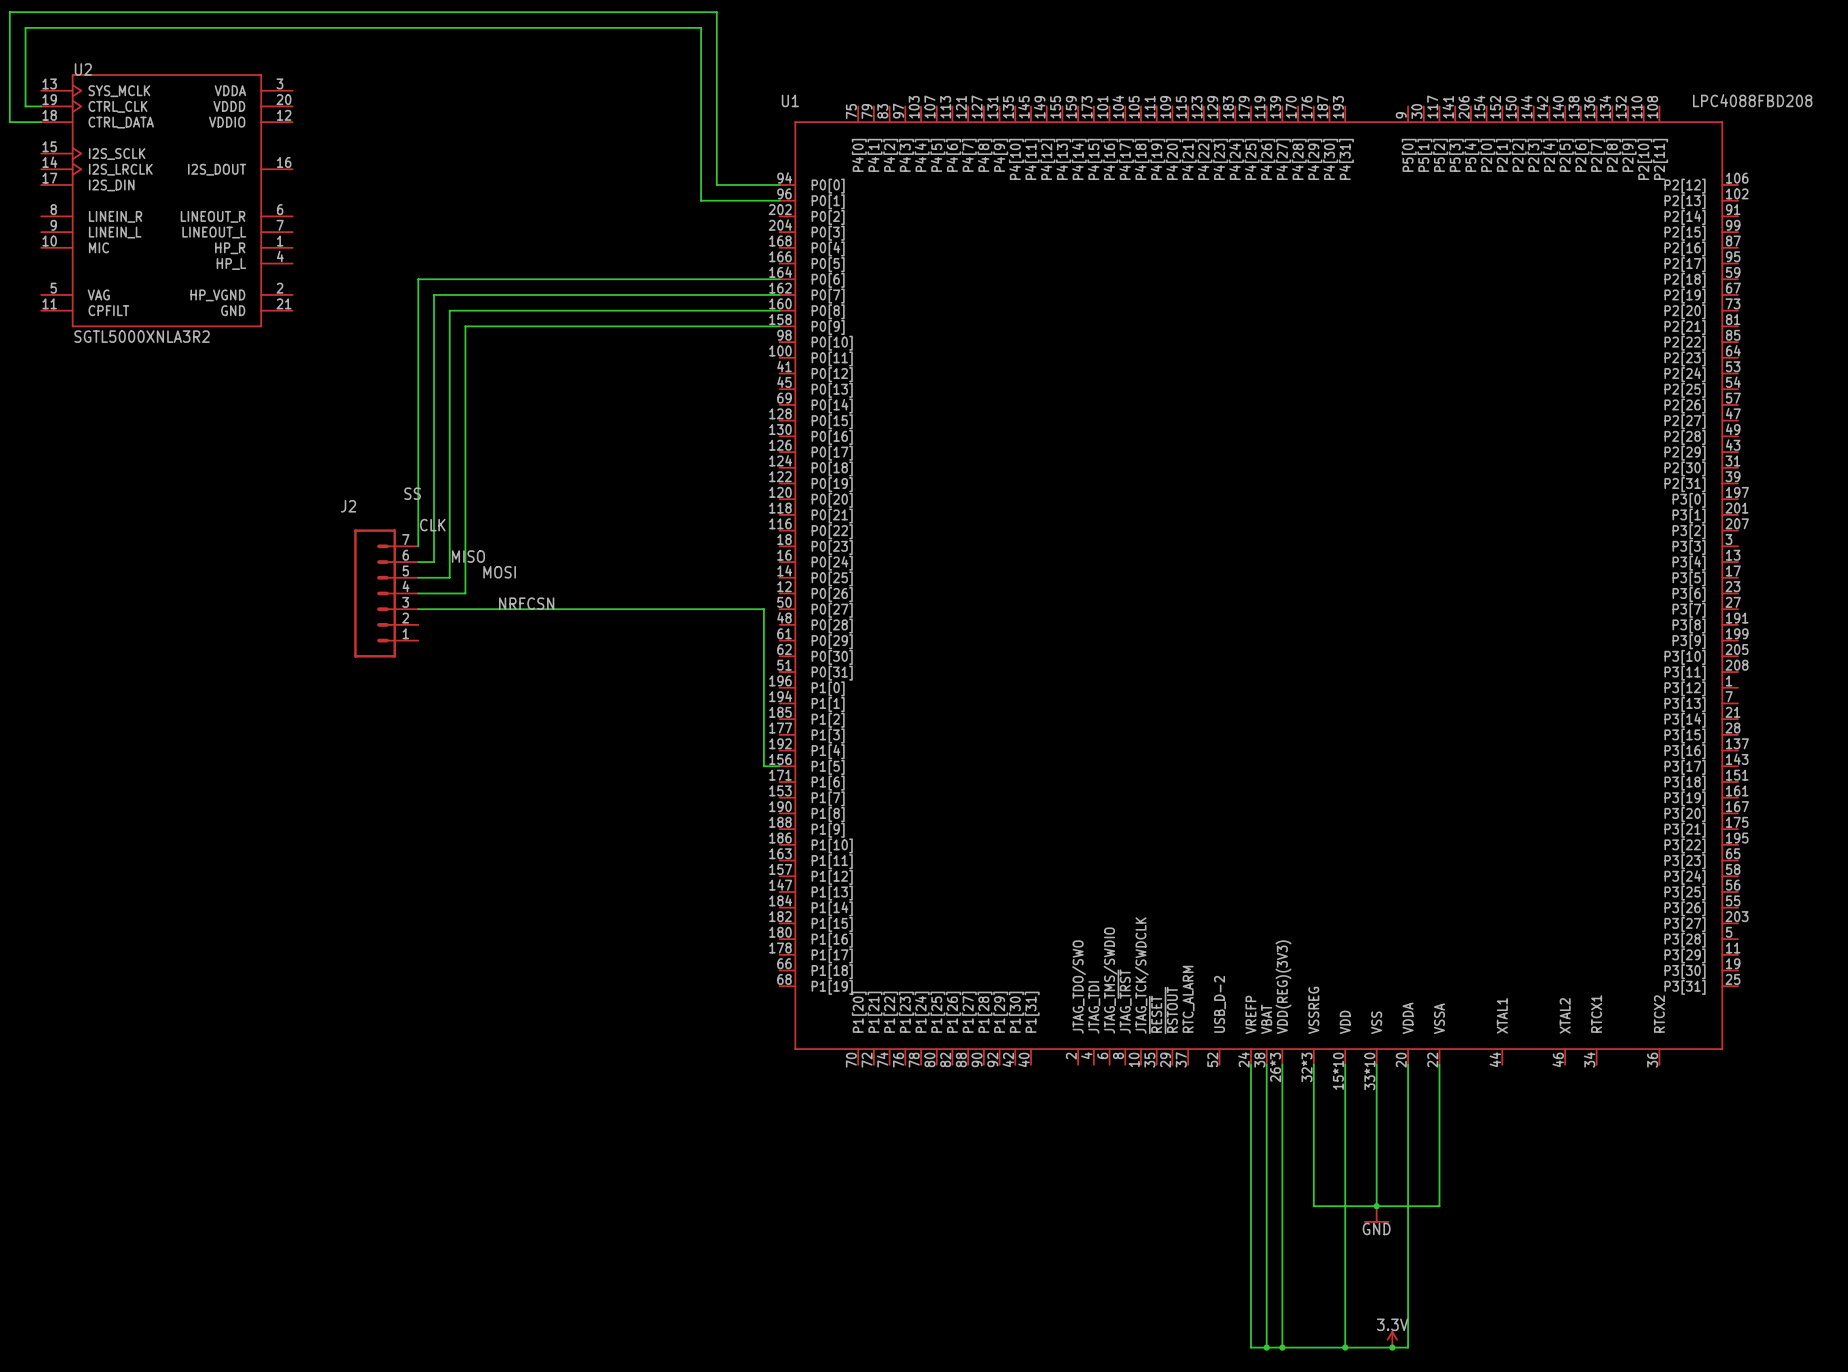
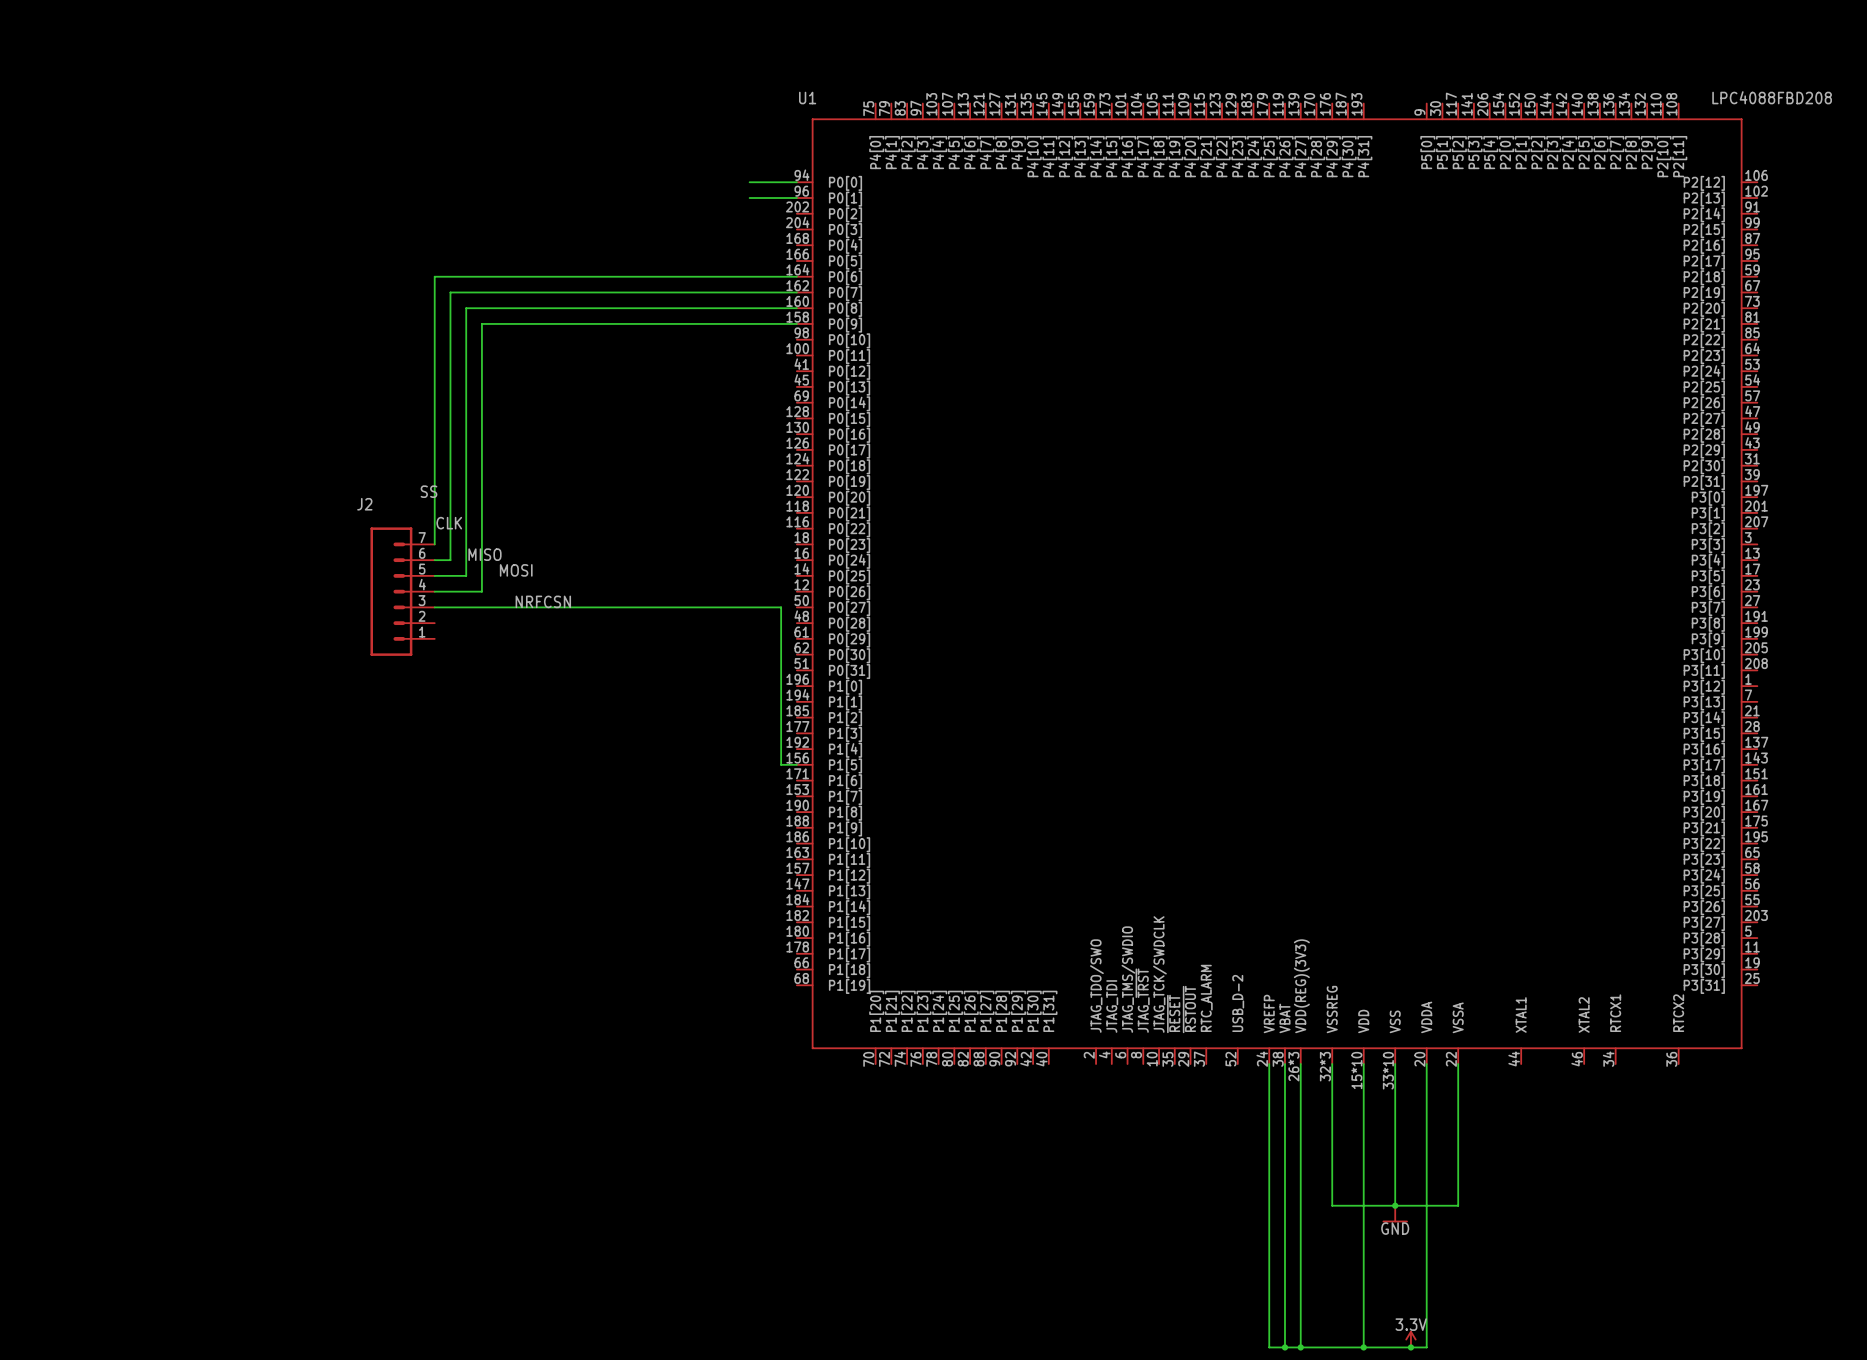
wire: (41, 106) (25, 106) (25, 27) (701, 27) (701, 200) (732, 200) -> none
wire: (41, 122) (9, 122) (9, 12) (716, 12) (716, 184) (732, 184) -> none
U2: SGTL5000XNLA3R2 (166, 200) -> none

